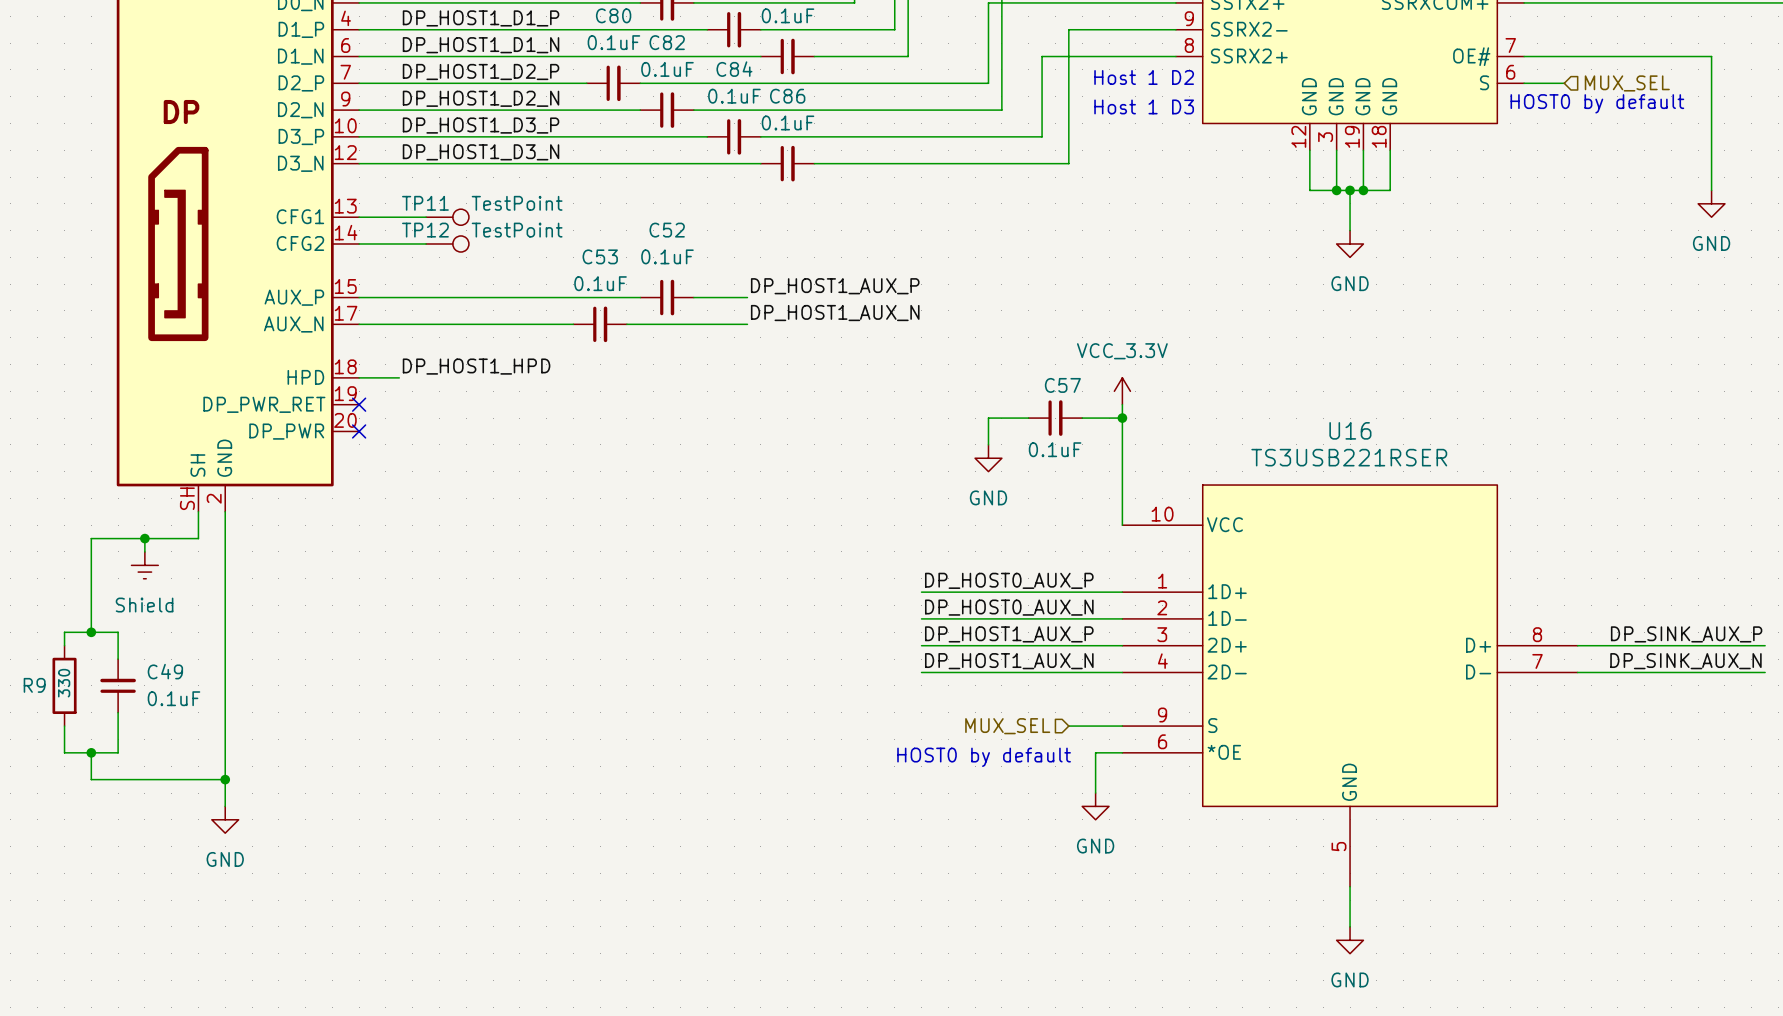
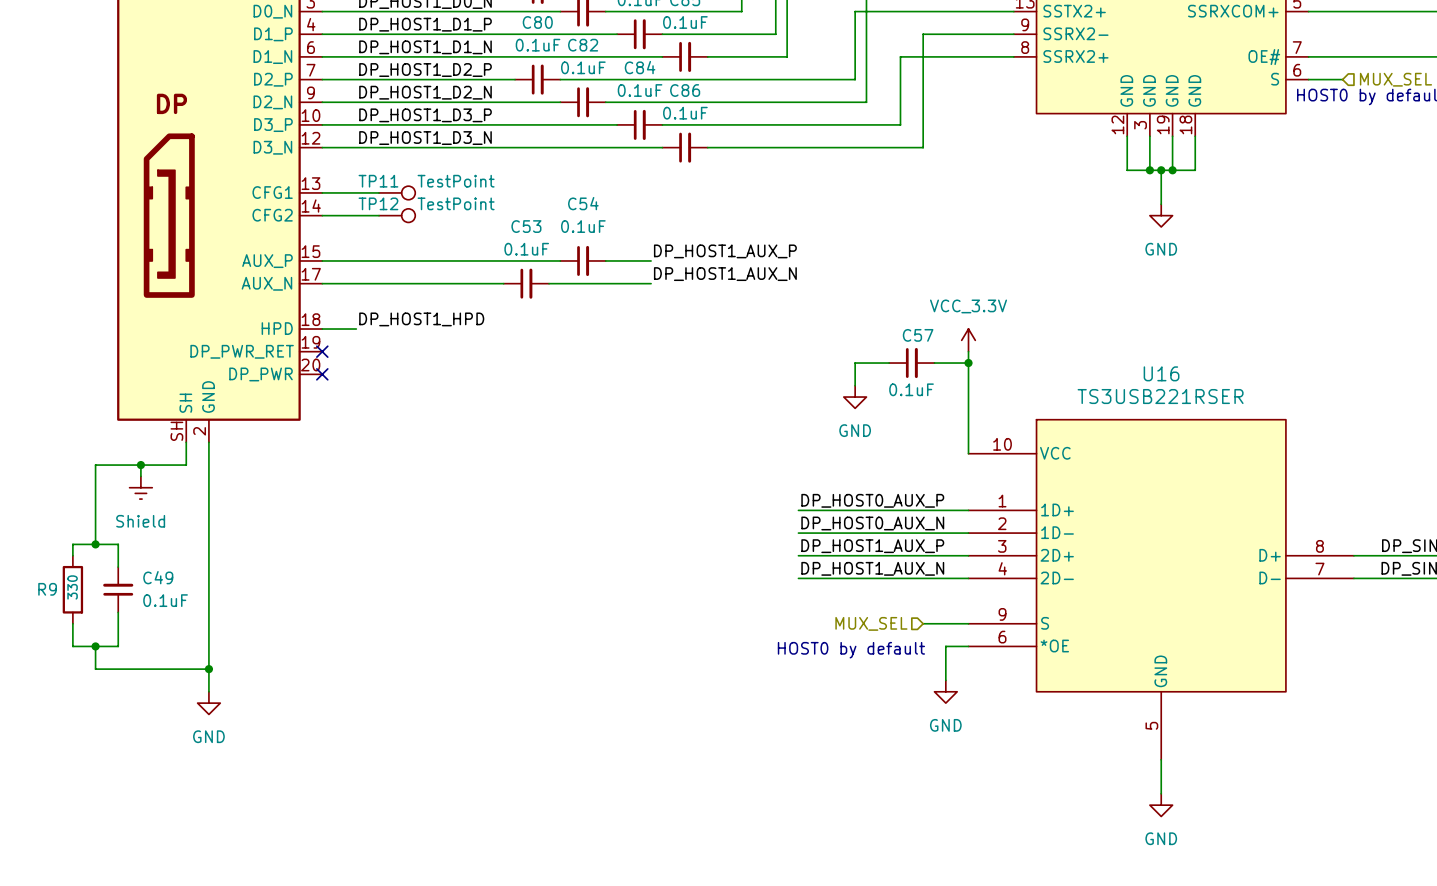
text: Host 1 D2 (1144, 77) -> none
text: Host 1 D3 (1144, 106) -> none
C52 name: C52 (667, 230) -> C54 (583, 203)

